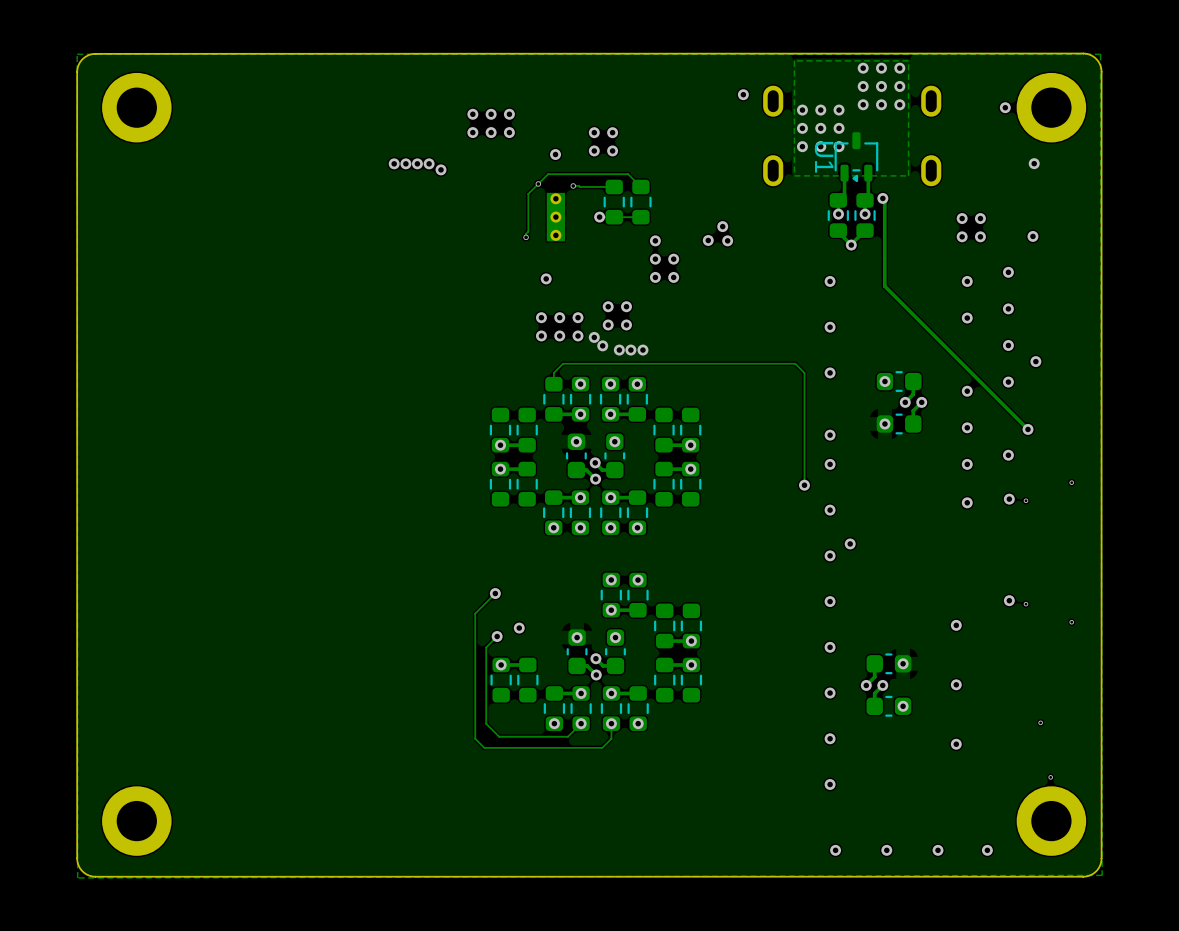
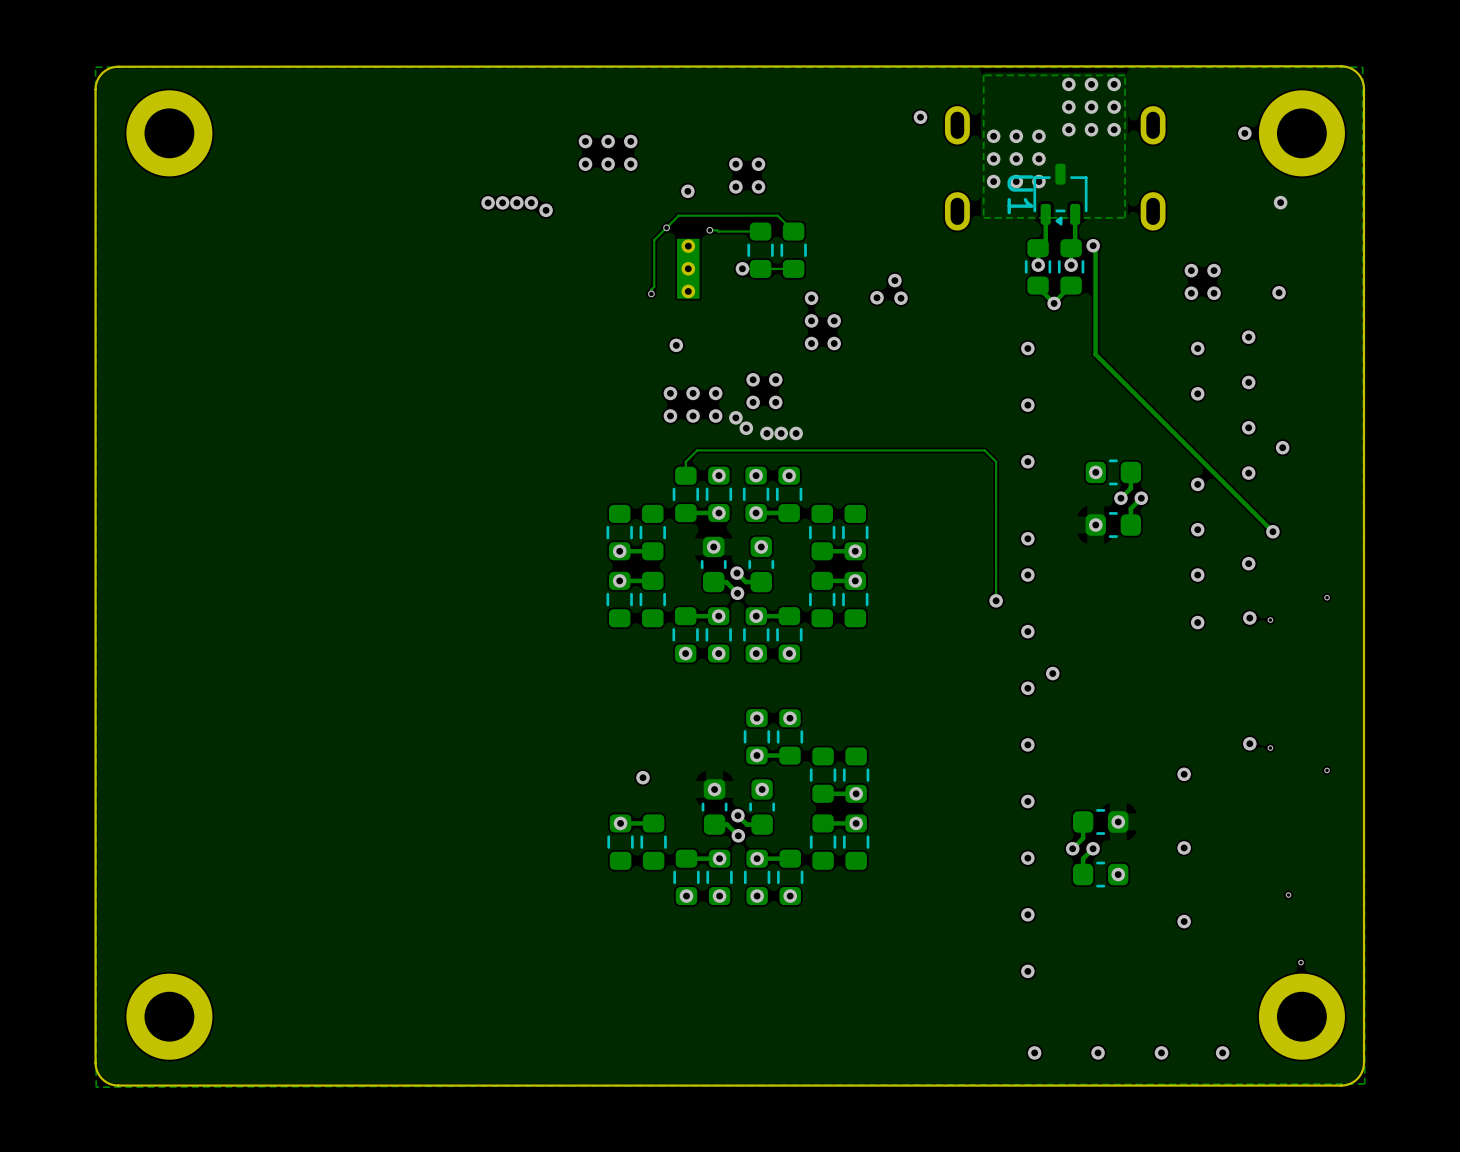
track: (495, 593) (475, 613) (475, 738) (484, 747) (602, 747) (611, 738) (611, 723) -> none
via: (495, 593) -> none
track: (497, 636) (486, 647) (486, 723) (499, 736) (568, 736) (581, 723) -> none
via: (497, 636) -> none

